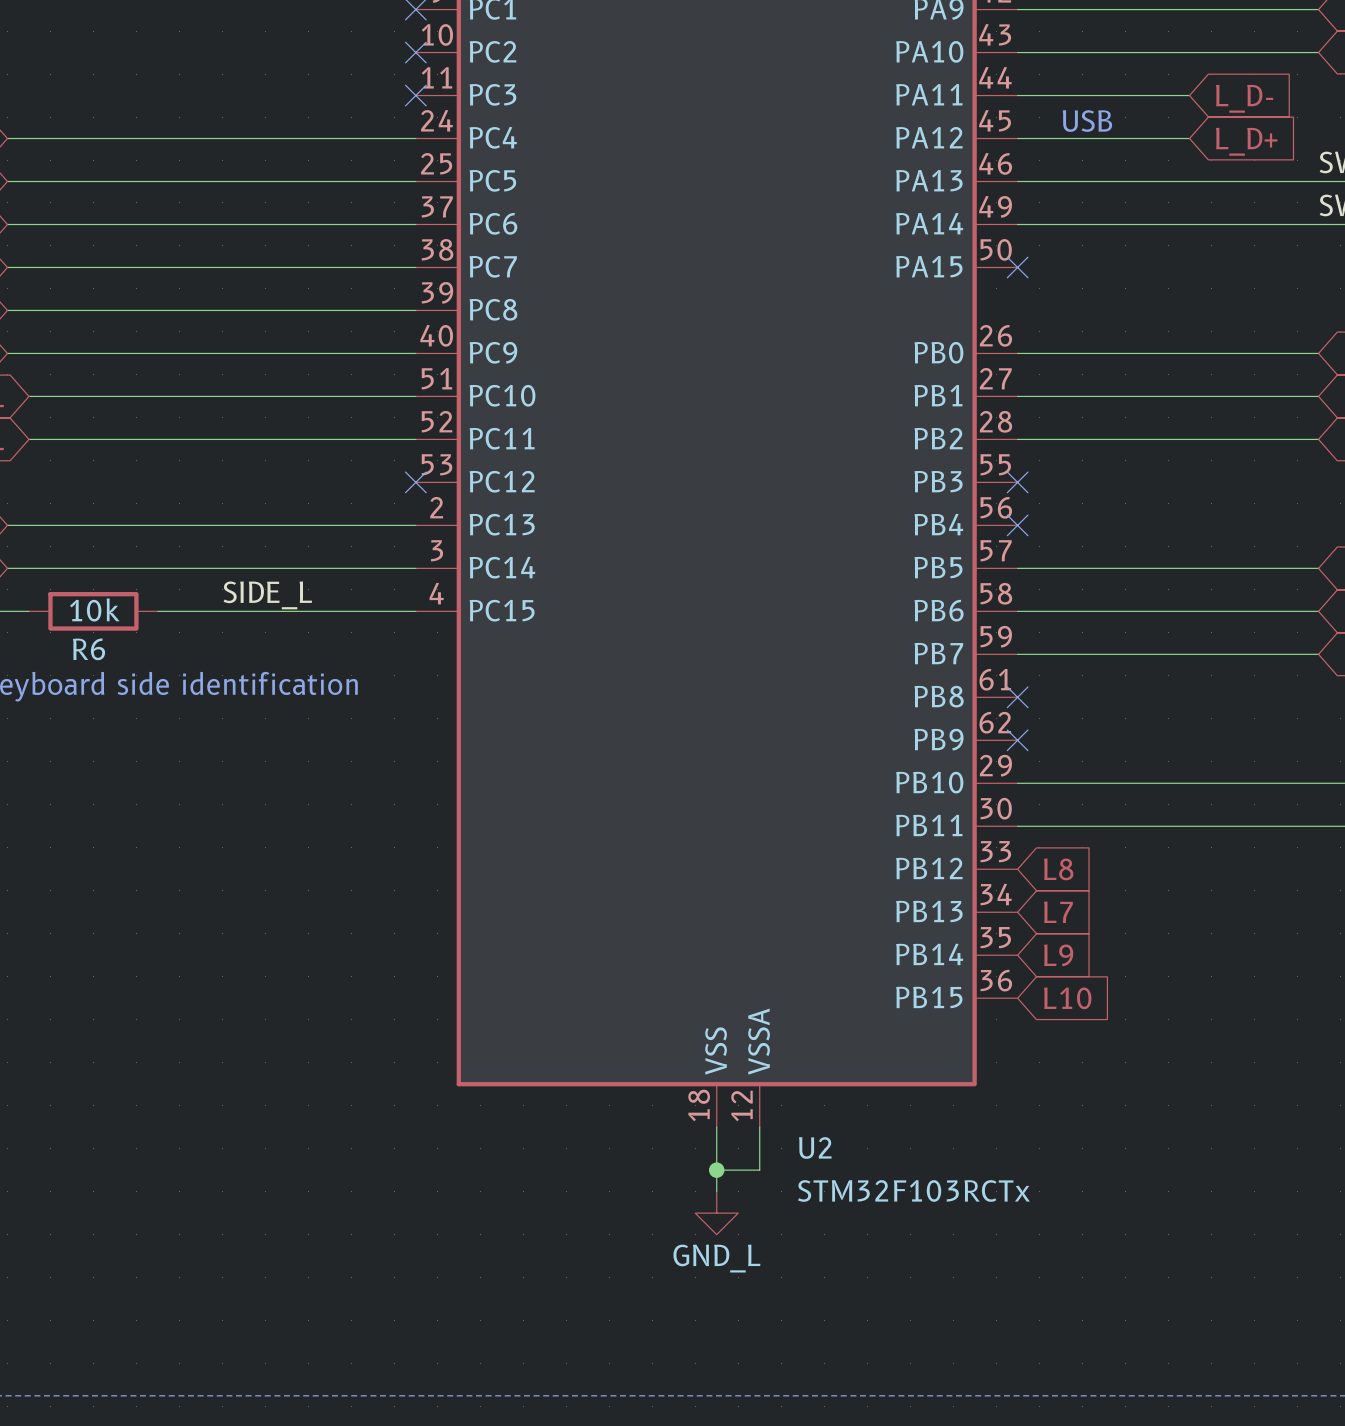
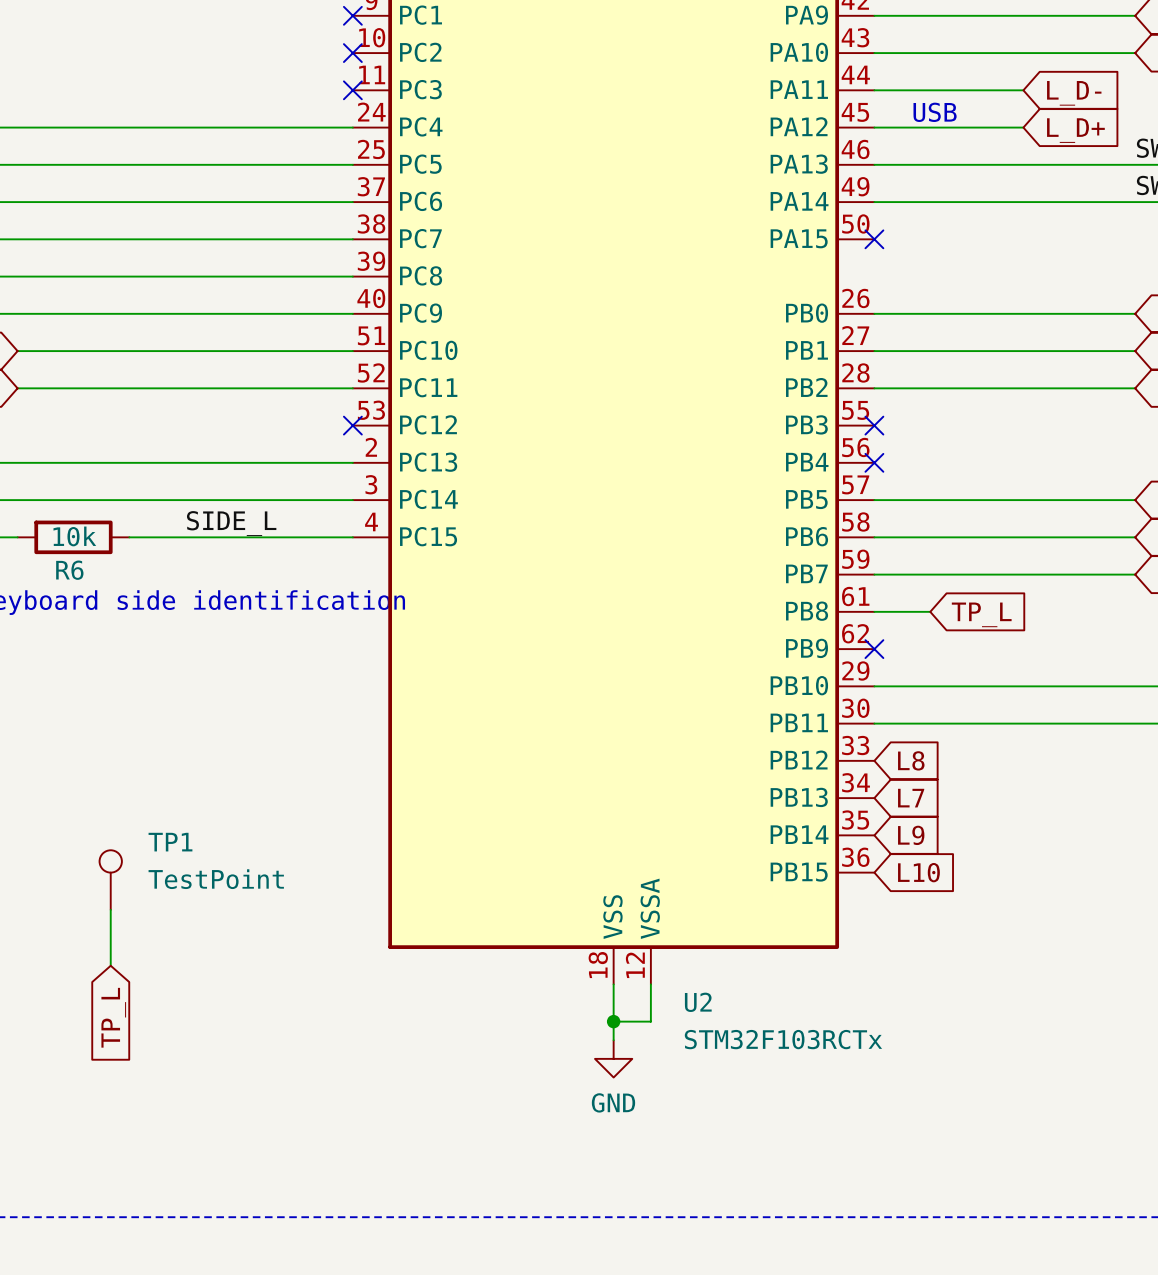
wire: none -> (874, 611) (930, 611)
no-connect mark: (1017, 697) -> none
global label: none -> TP_L (981, 614)
TP1: none -> TestPoint (110, 880)
wire: none -> (110, 909) (110, 965)
global label: none -> TP_L (113, 1017)
power symbol: GND_L (716, 1213) -> GND (613, 1058)

